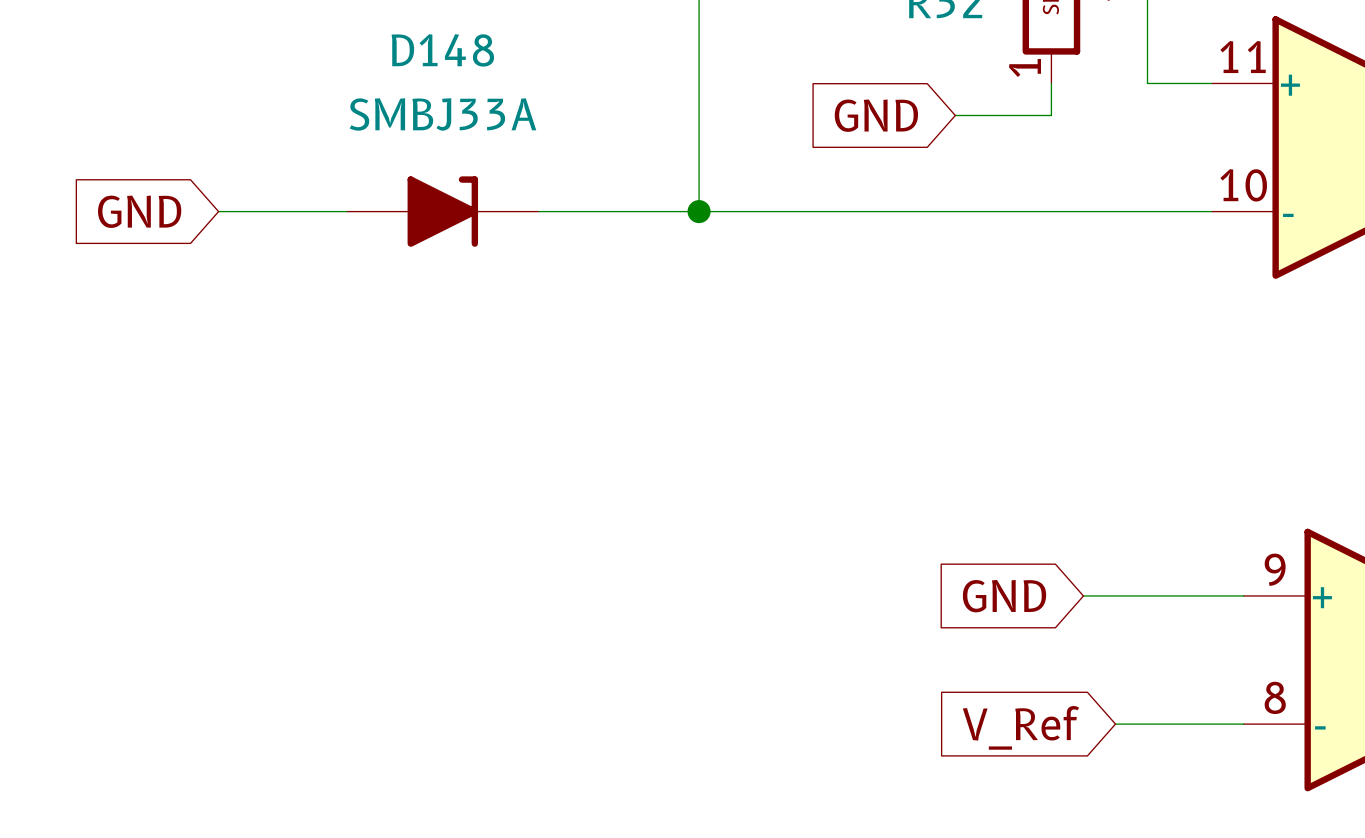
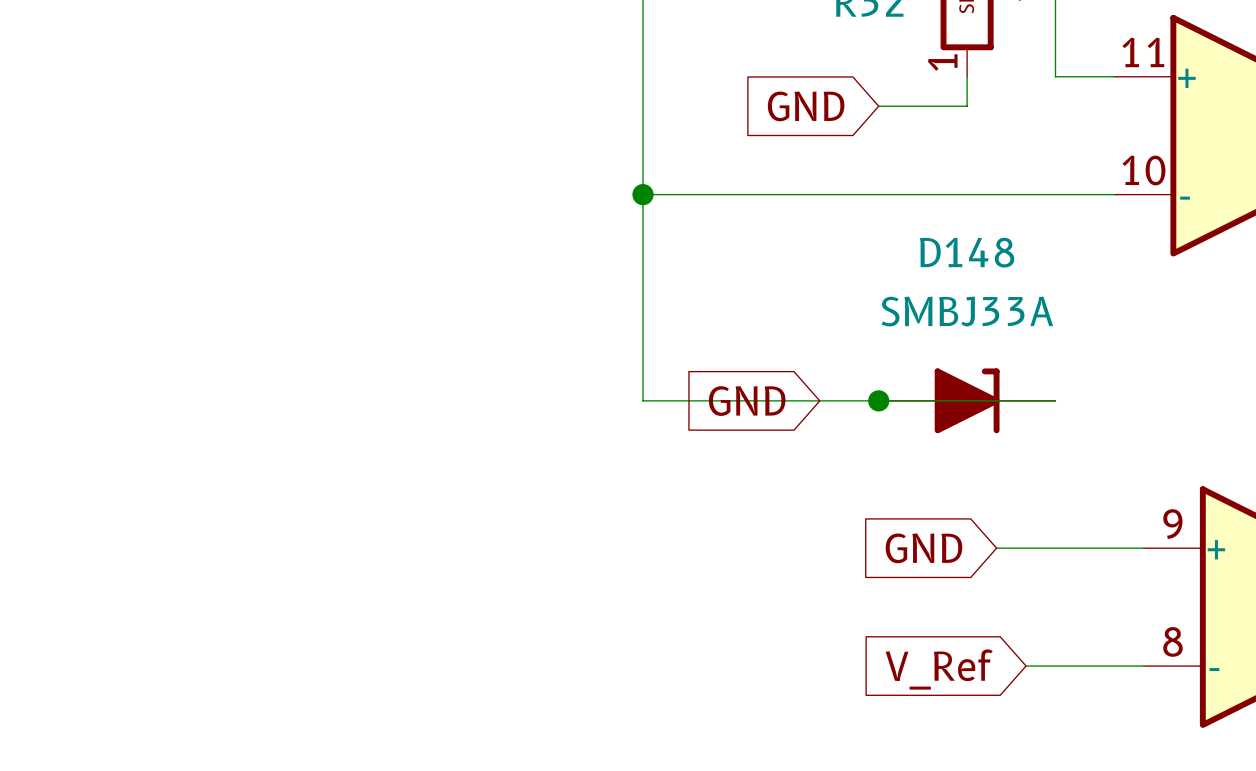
global label: GND (139, 211) -> none
wire: (218, 211) (346, 211) -> none
D148 position: (442, 211) -> (967, 400)
wire: (538, 211) (699, 211) -> (1055, 400) (643, 400) (643, 194)
global label: none -> GND (747, 401)
junction: none -> (878, 400)

